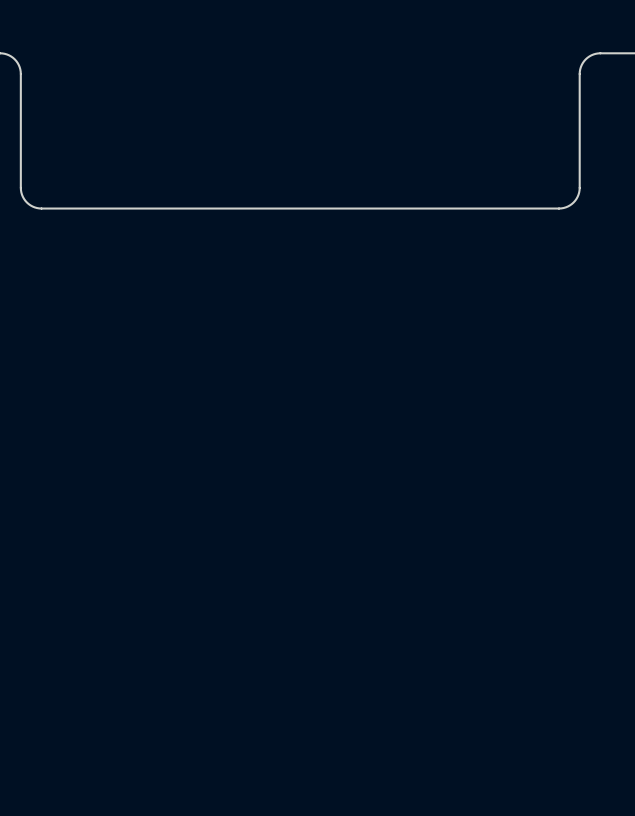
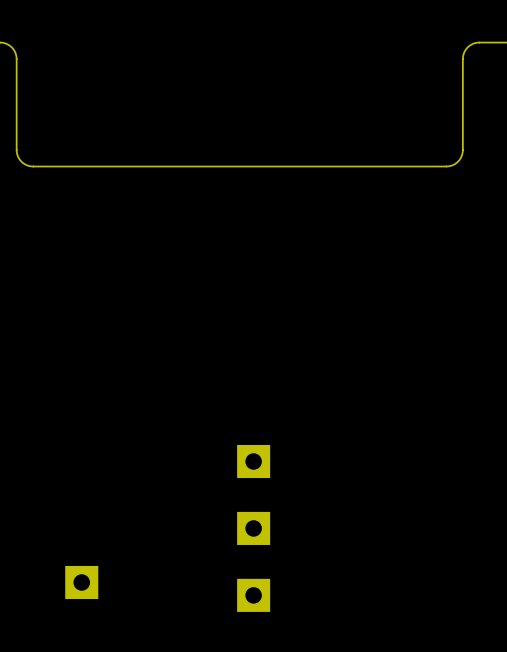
part: none -> (253, 461)
part: none -> (253, 528)
part: none -> (81, 582)
part: none -> (253, 595)

